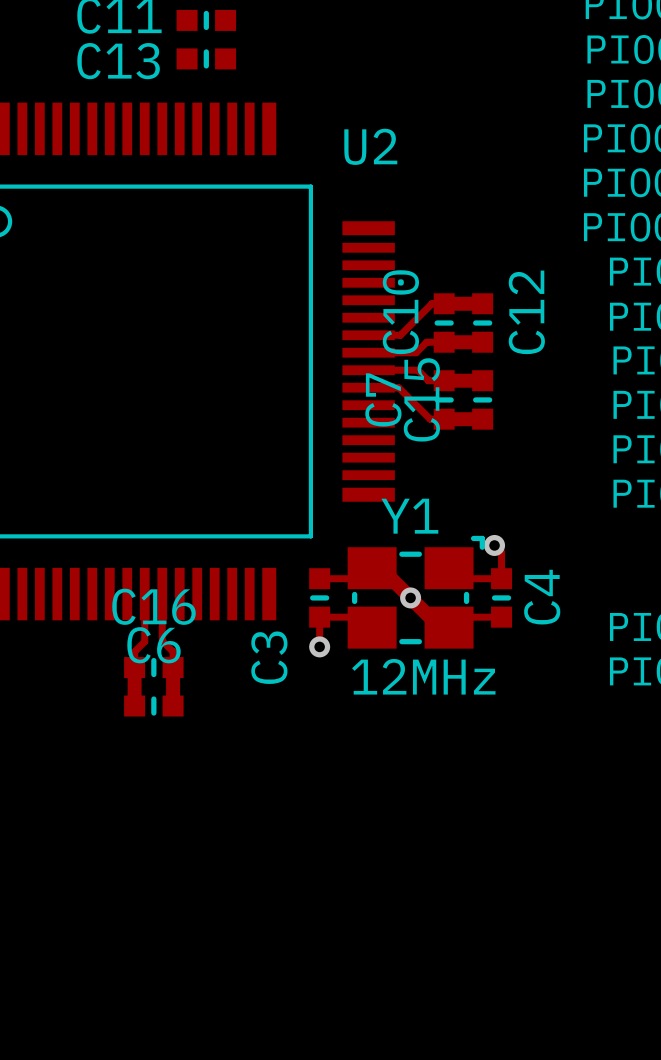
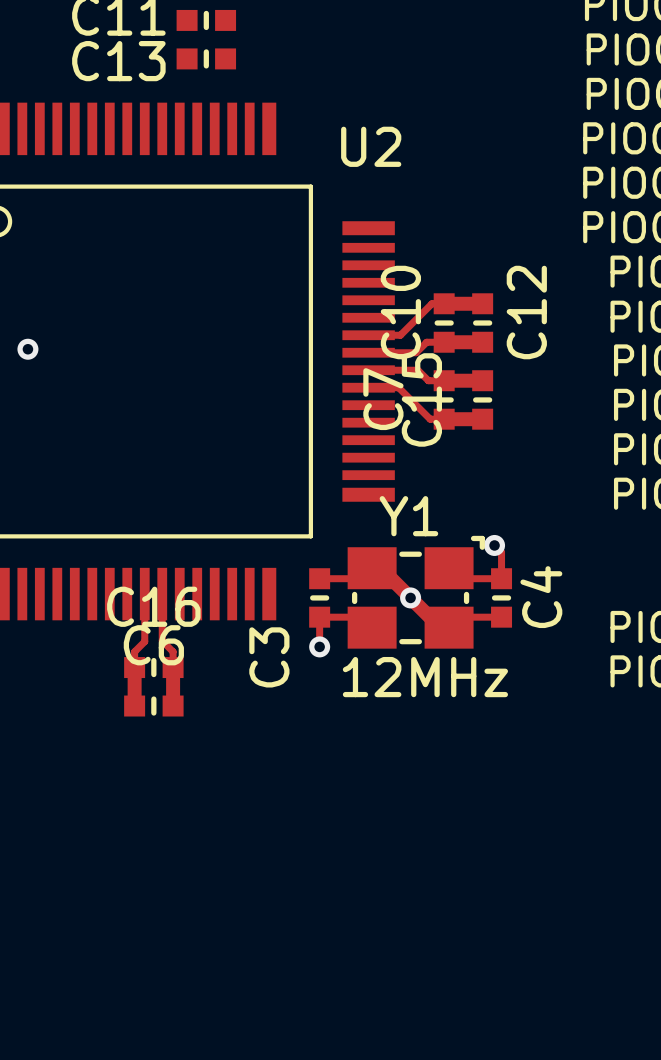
via: none -> (27, 349)

